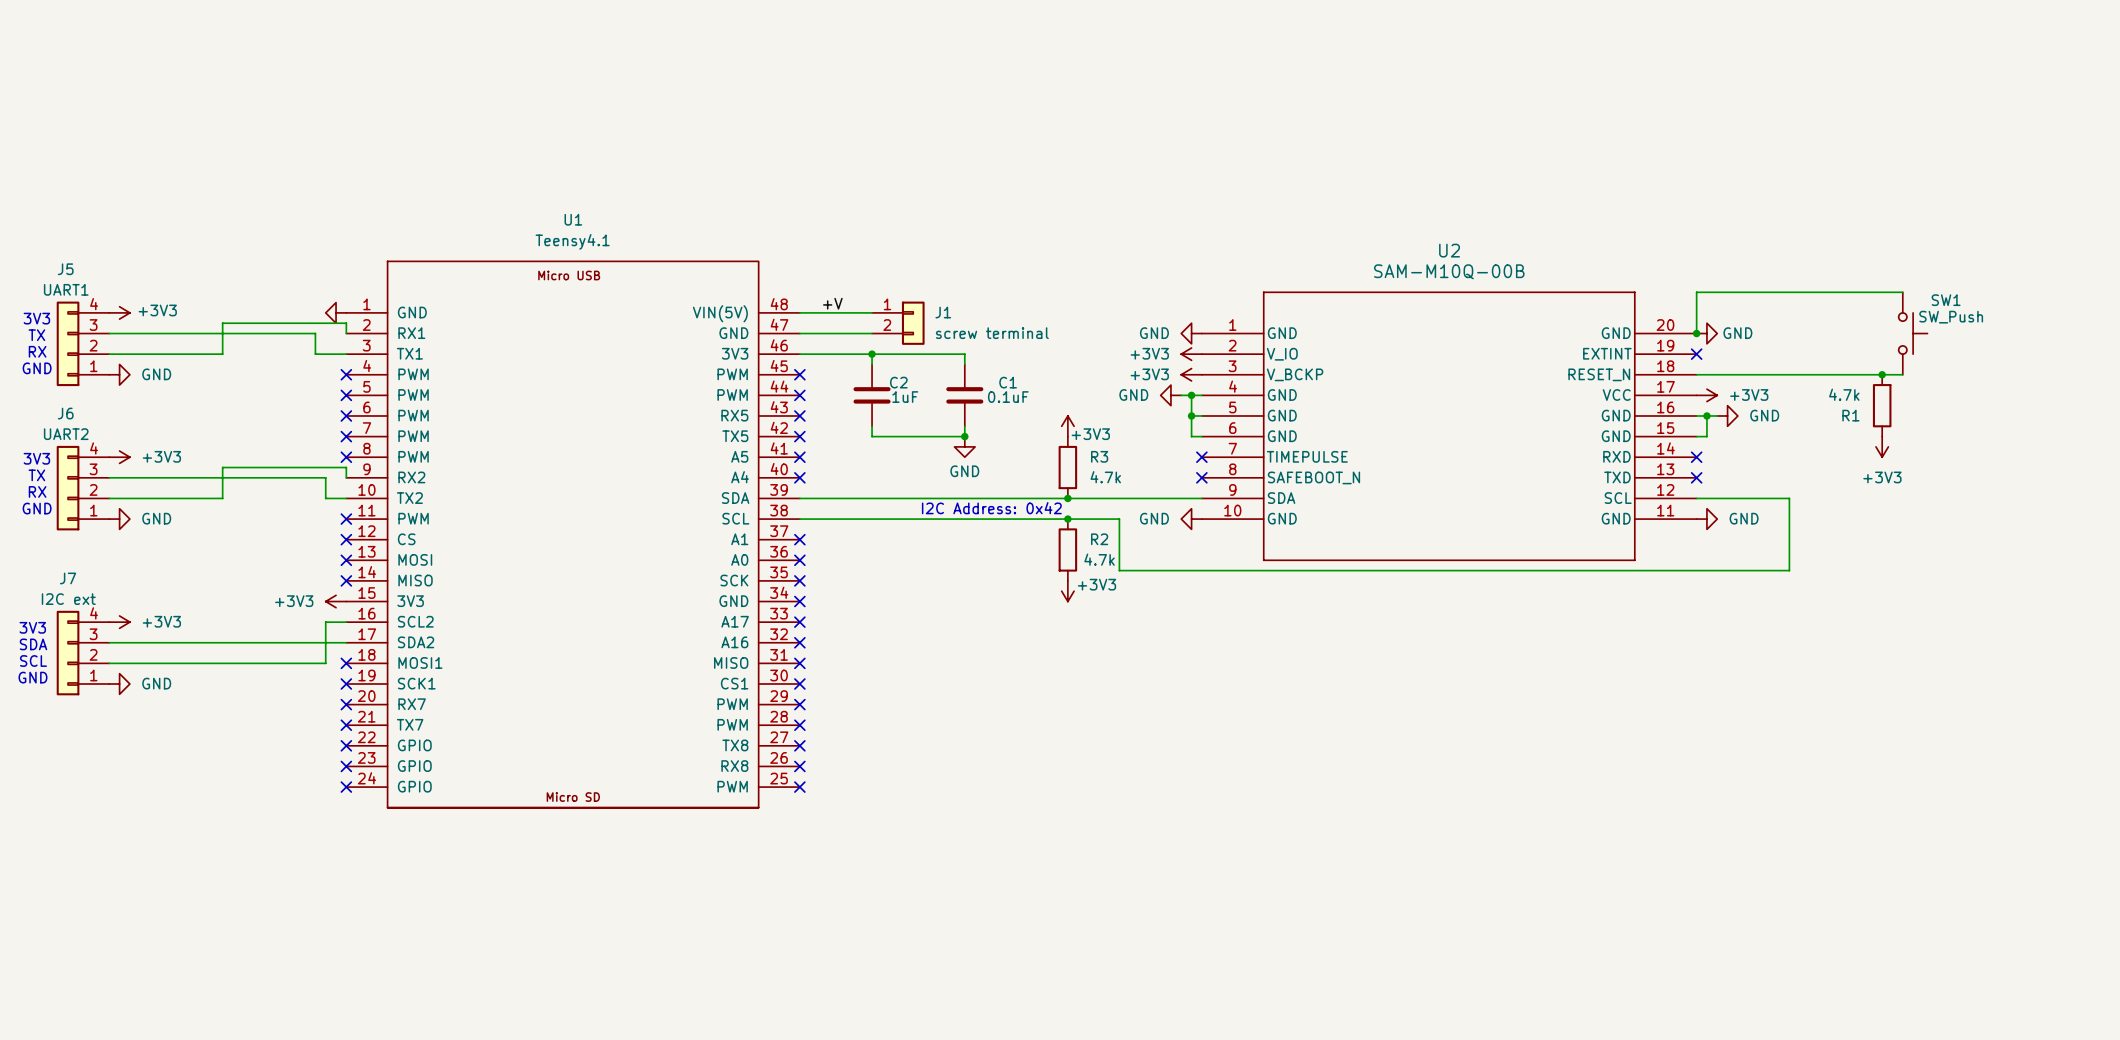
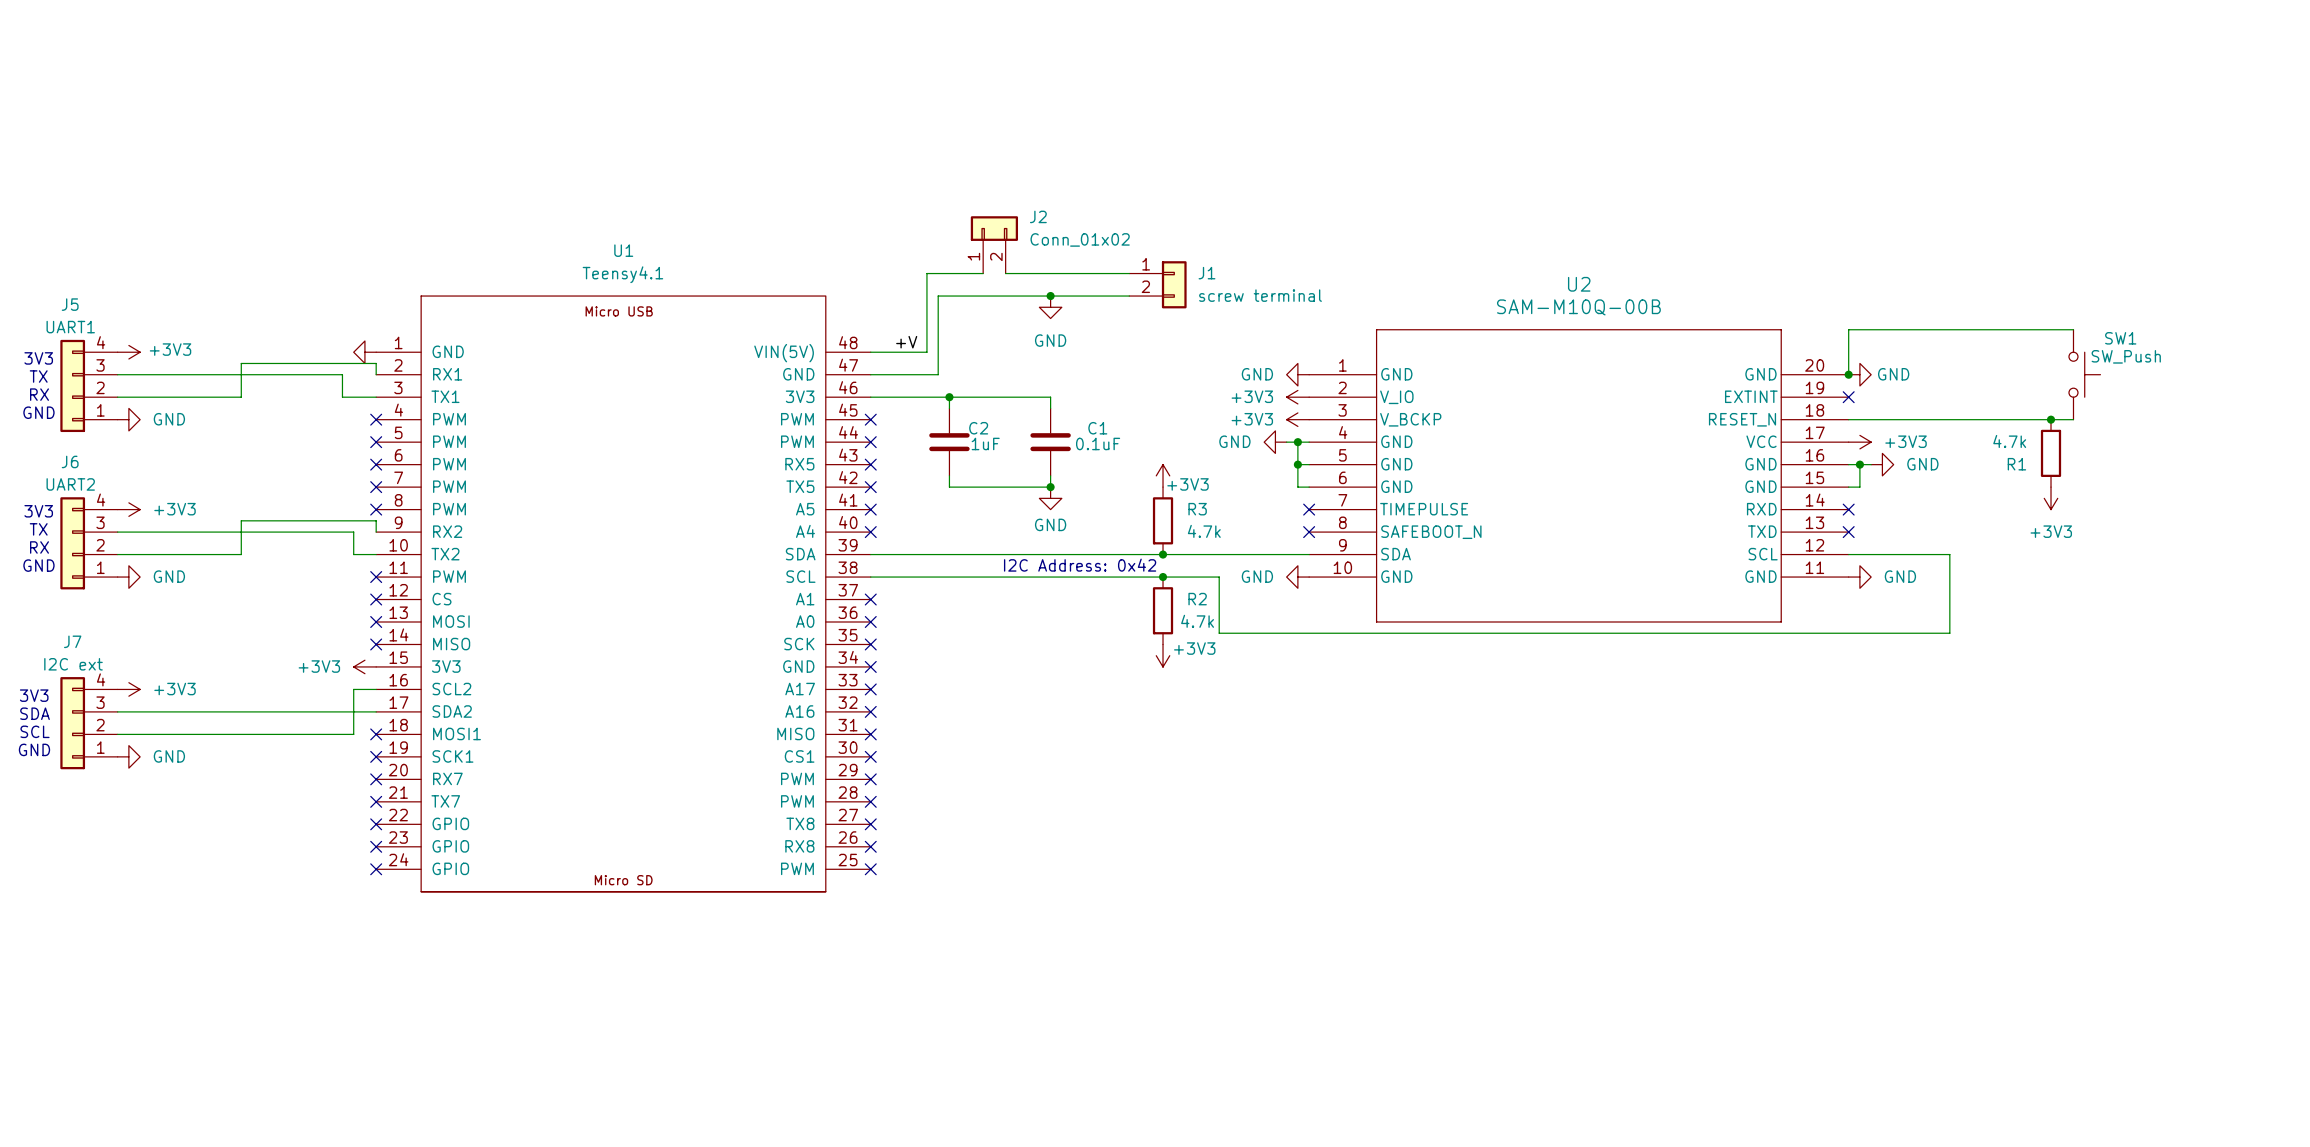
J2: none -> Conn_01x02 (994, 244)
wire: none -> (1005, 273) (1129, 273)
junction: none -> (1050, 296)
power symbol: none -> GND (1050, 307)
wire: (851, 312) (872, 312) -> (926, 352) (926, 273) (983, 273)
J1 position: (898, 323) -> (1157, 284)
wire: (861, 333) (872, 333) -> (938, 374) (938, 296) (1129, 296)

